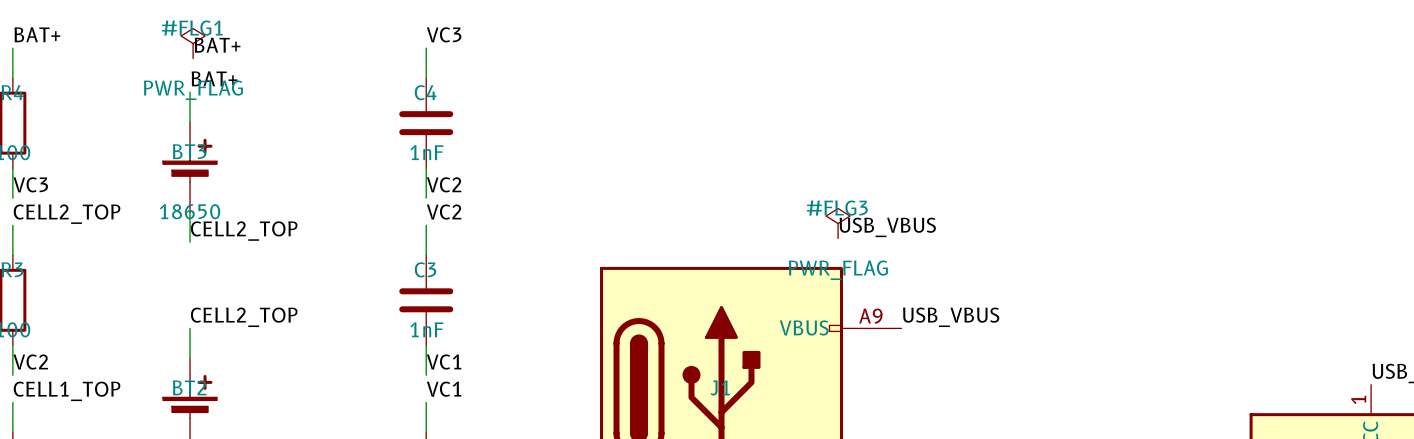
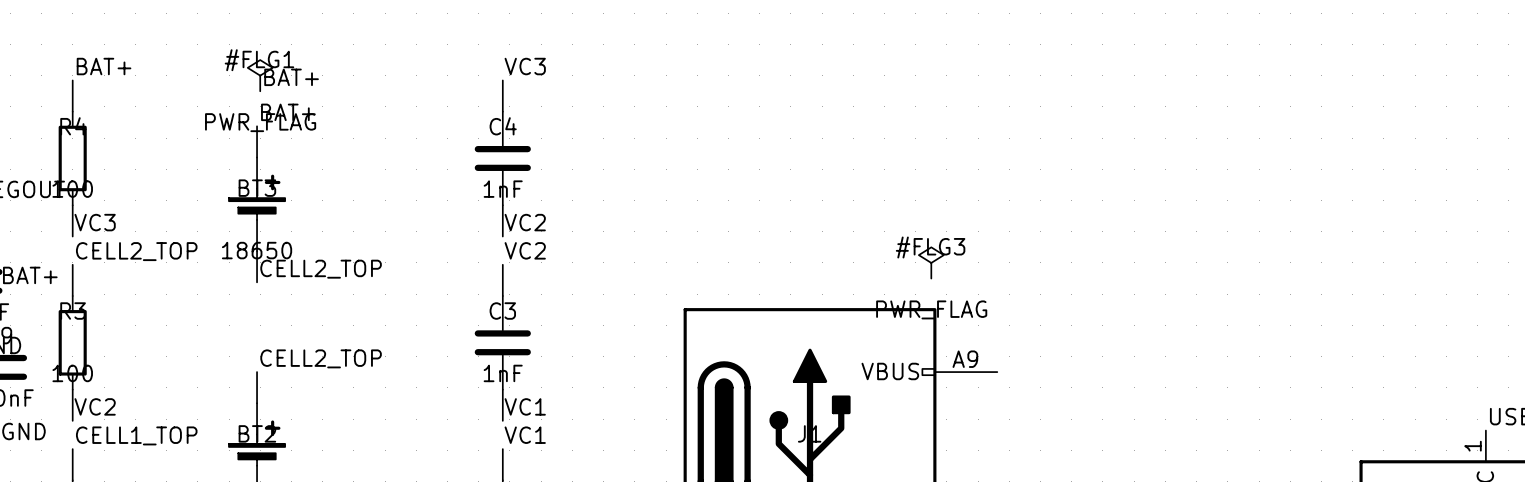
label: USB_VBUS (887, 227) -> none
label: USB_VBUS (951, 317) -> none

